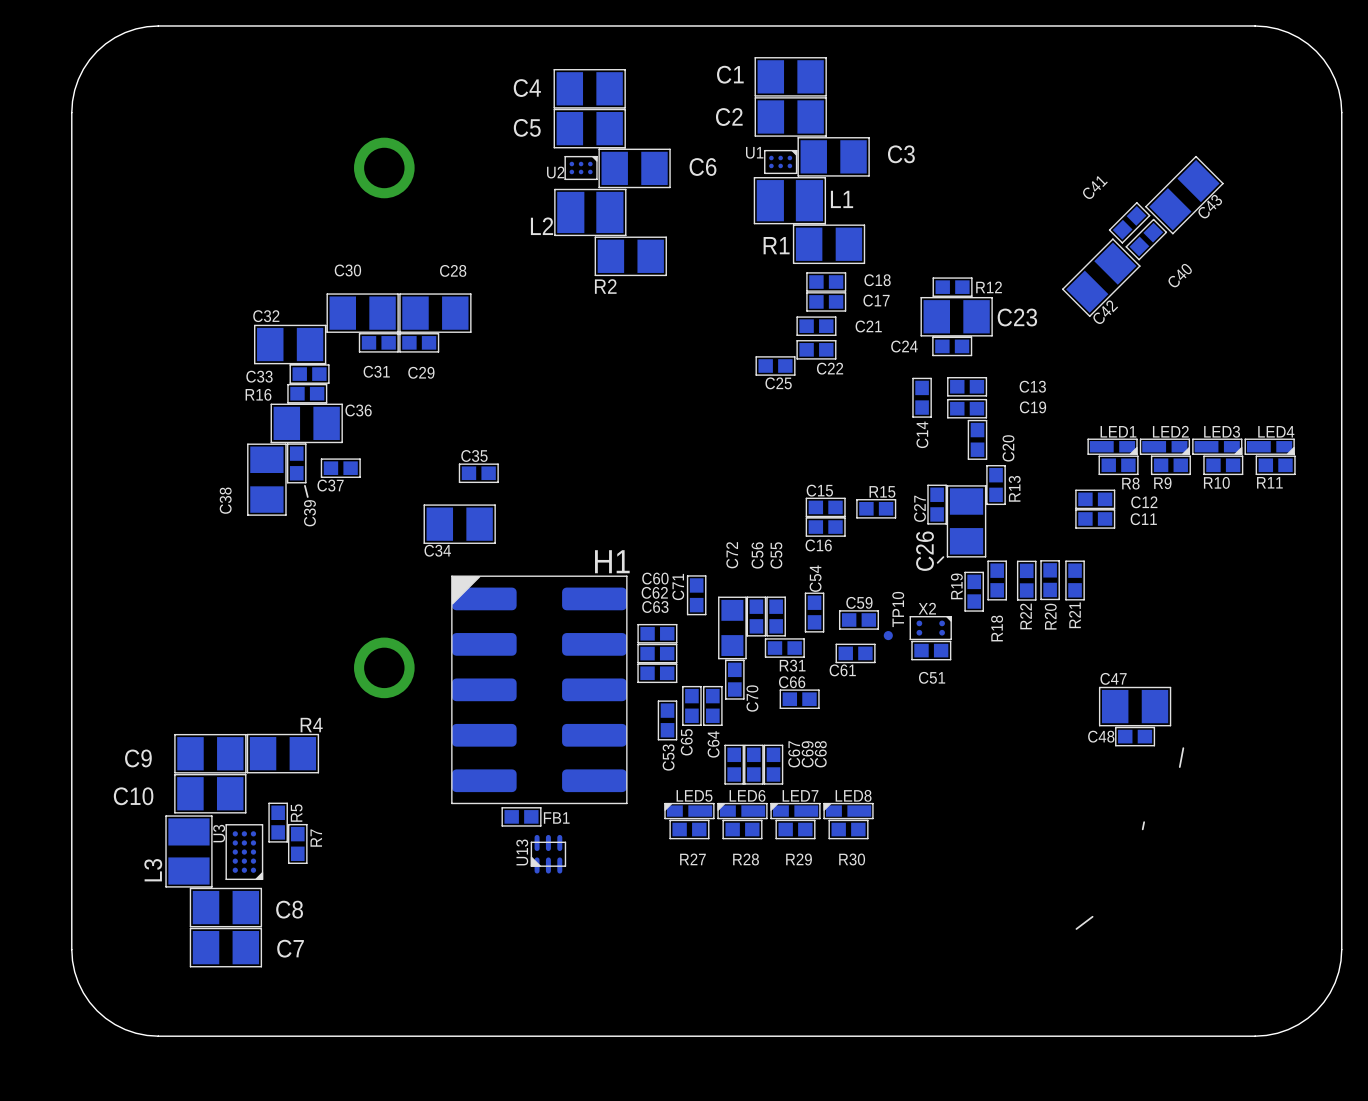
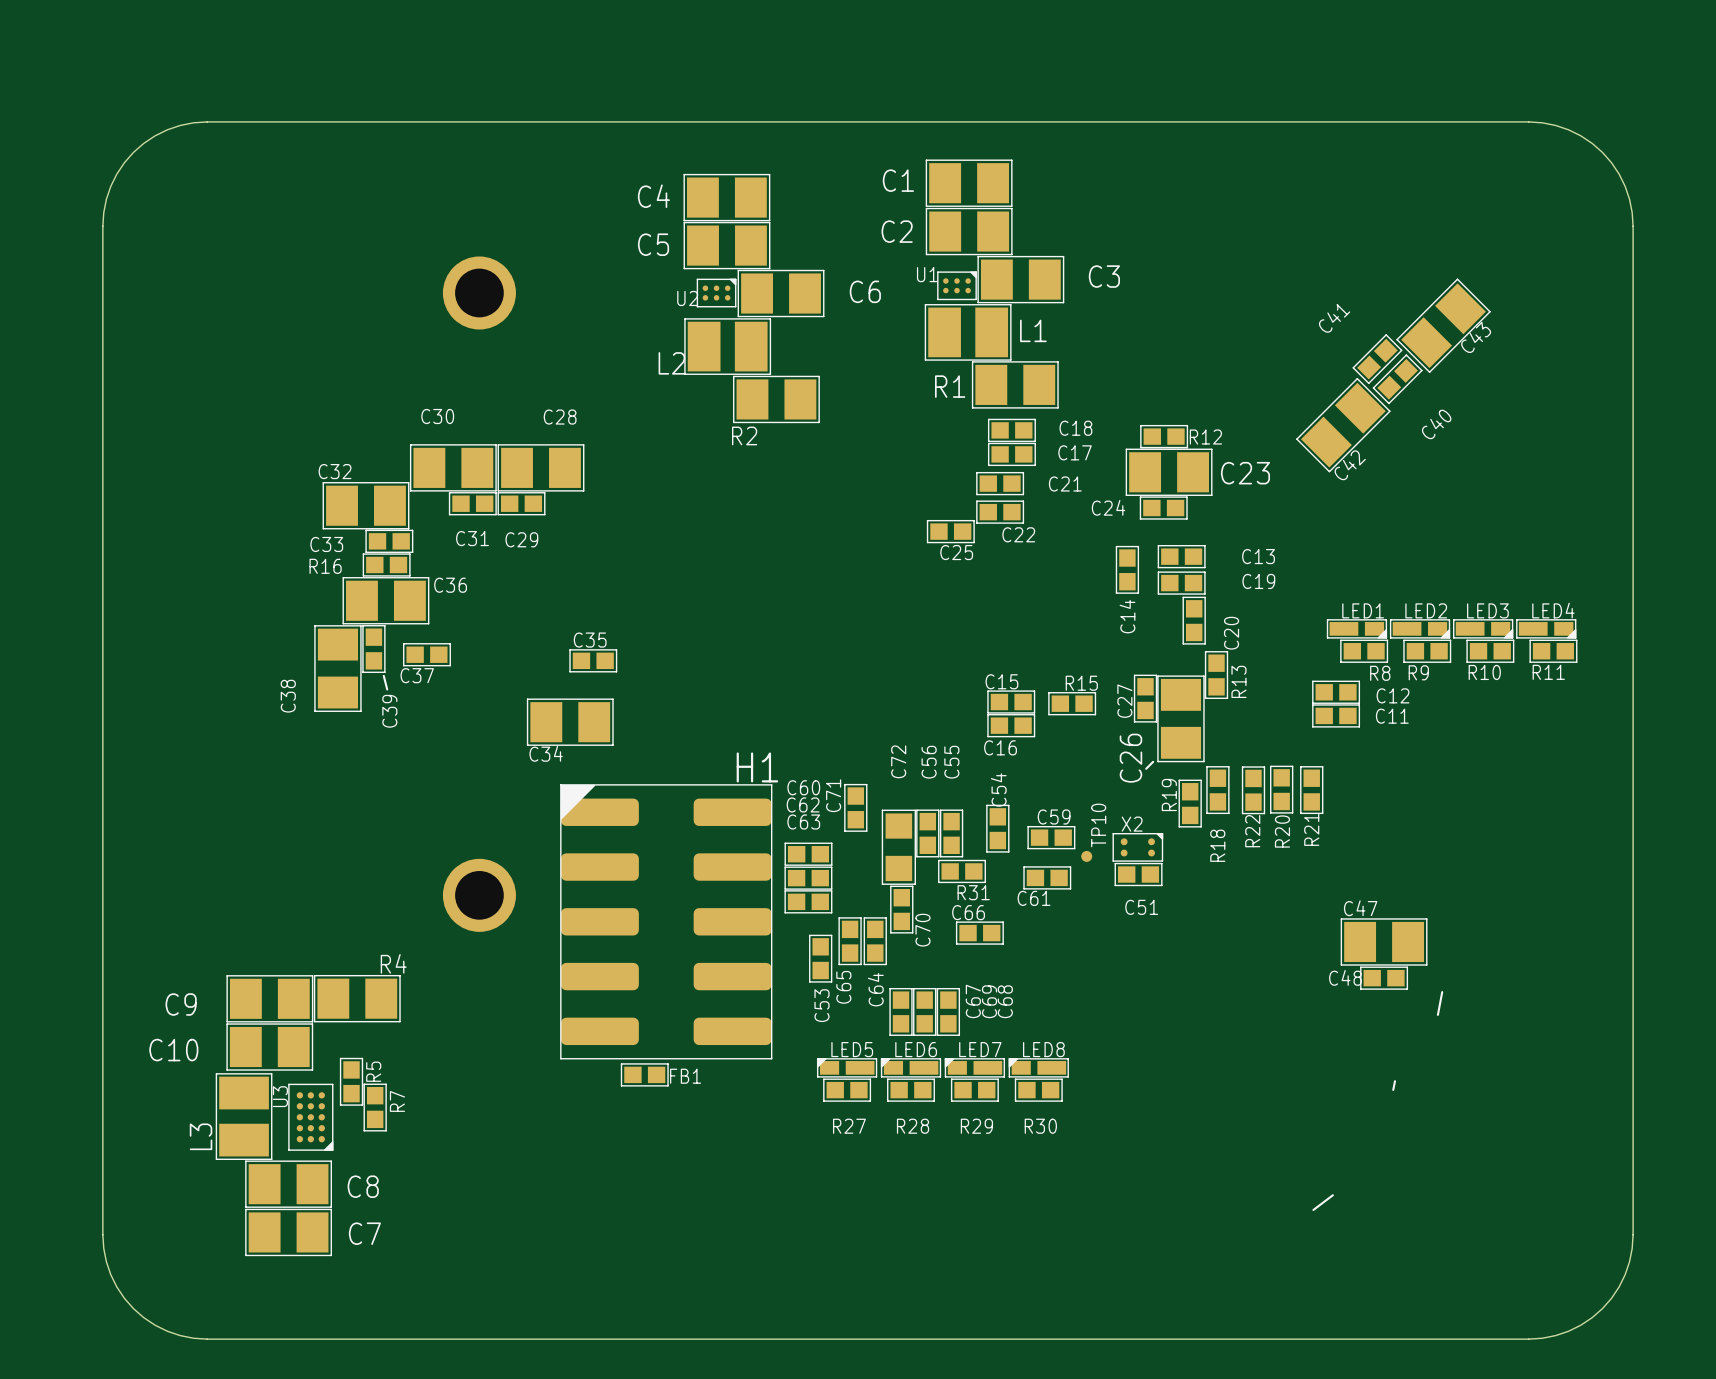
U13: (548, 854) -> none

